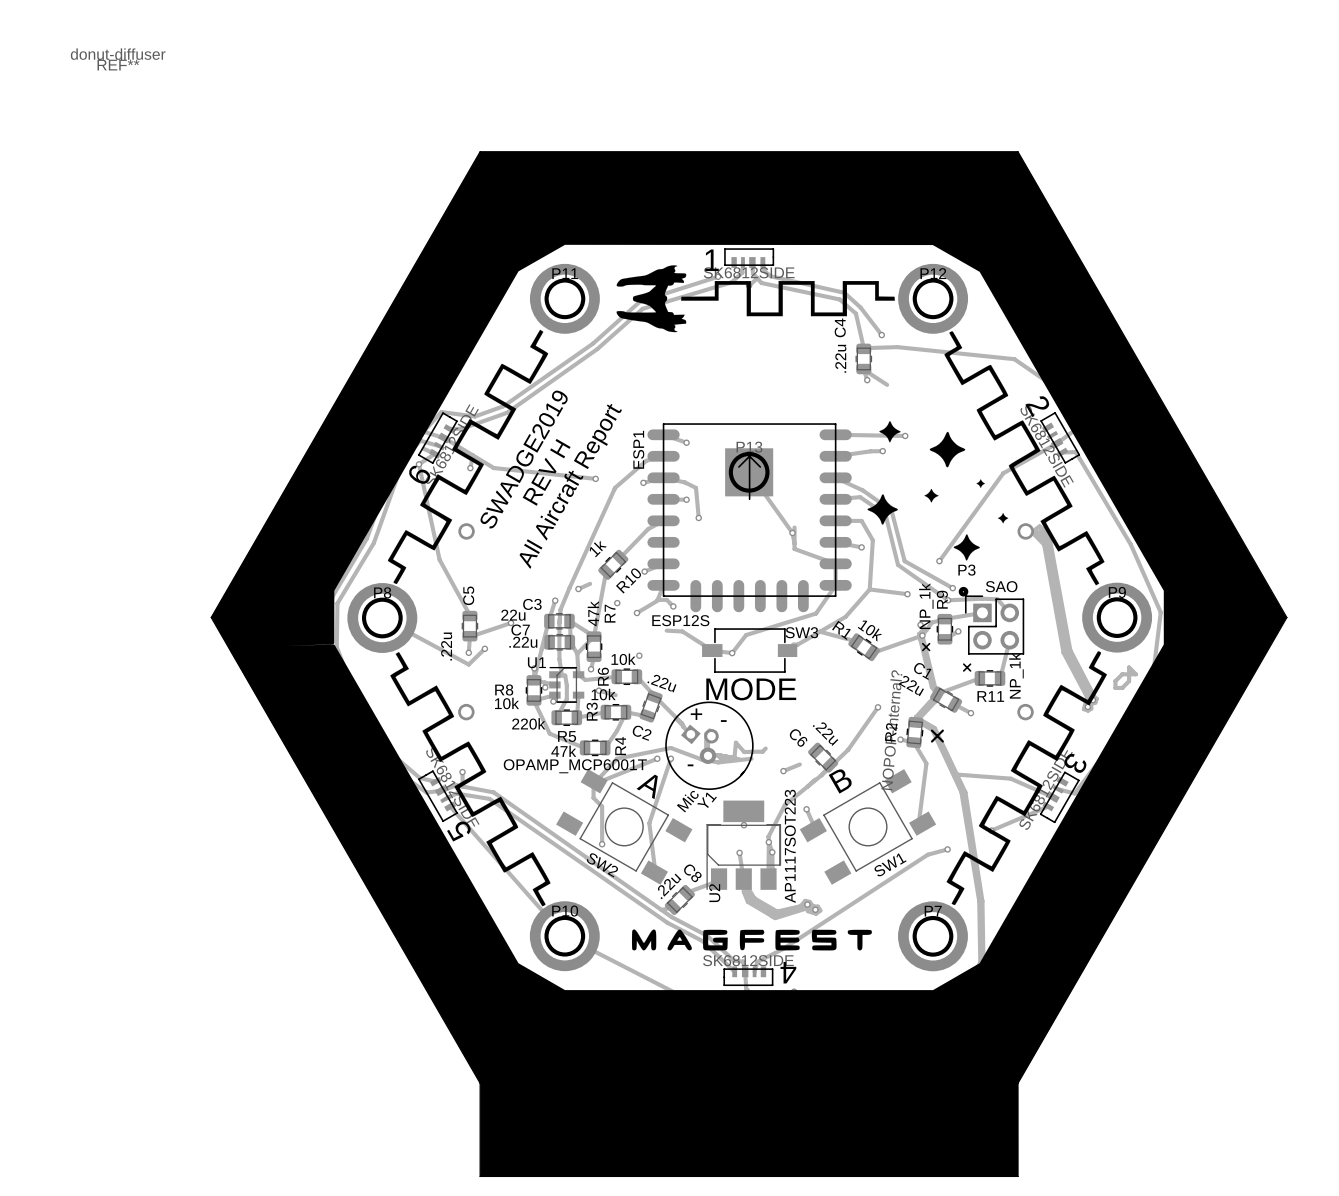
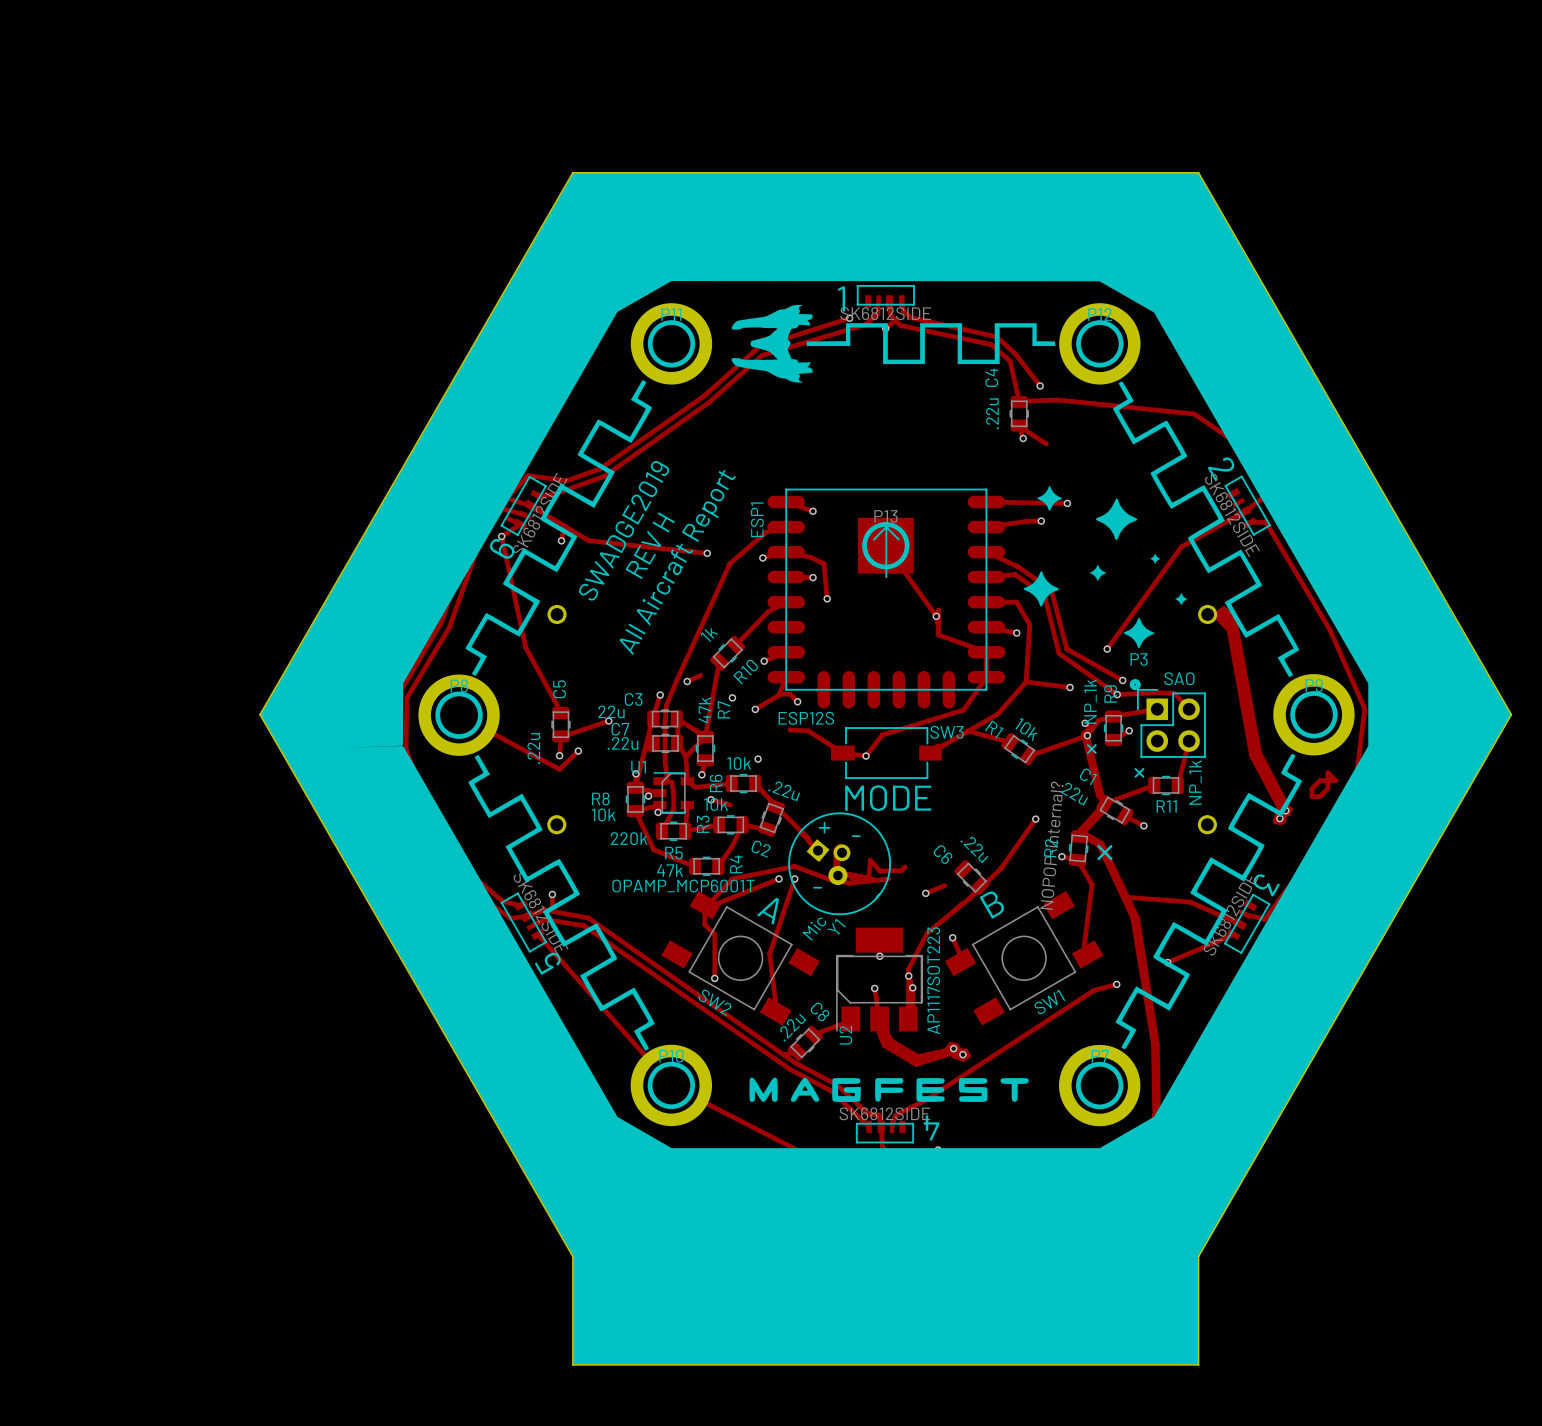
REF**: donut-diffuser (118, 59) -> none

